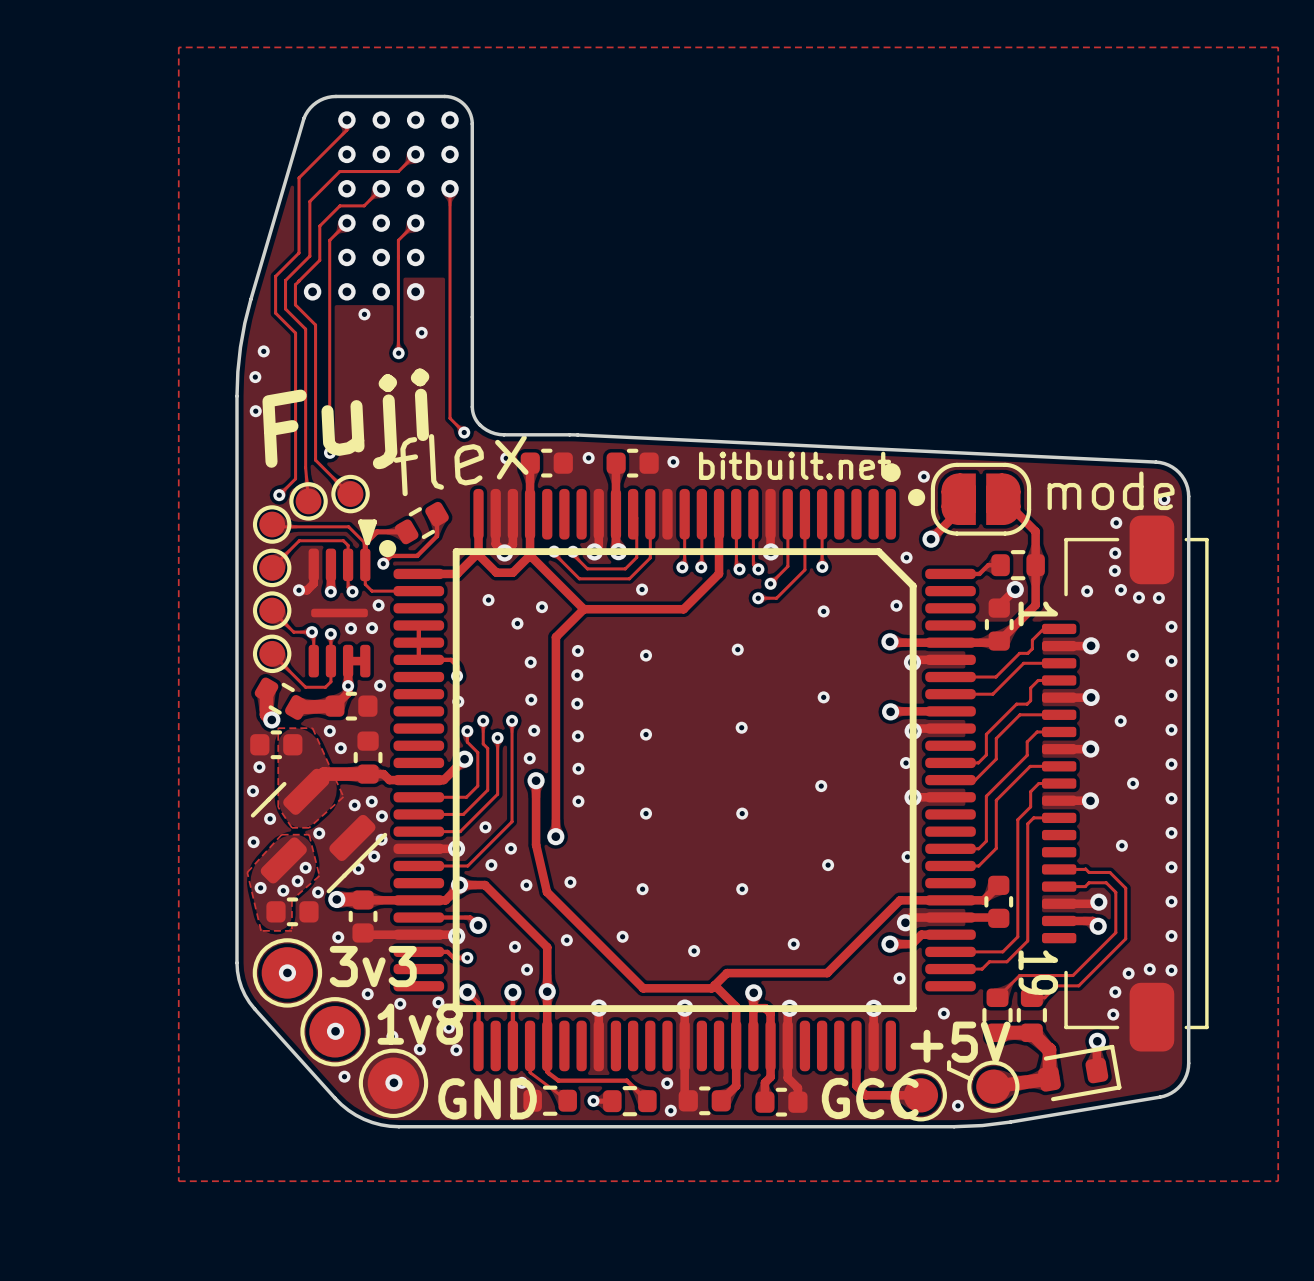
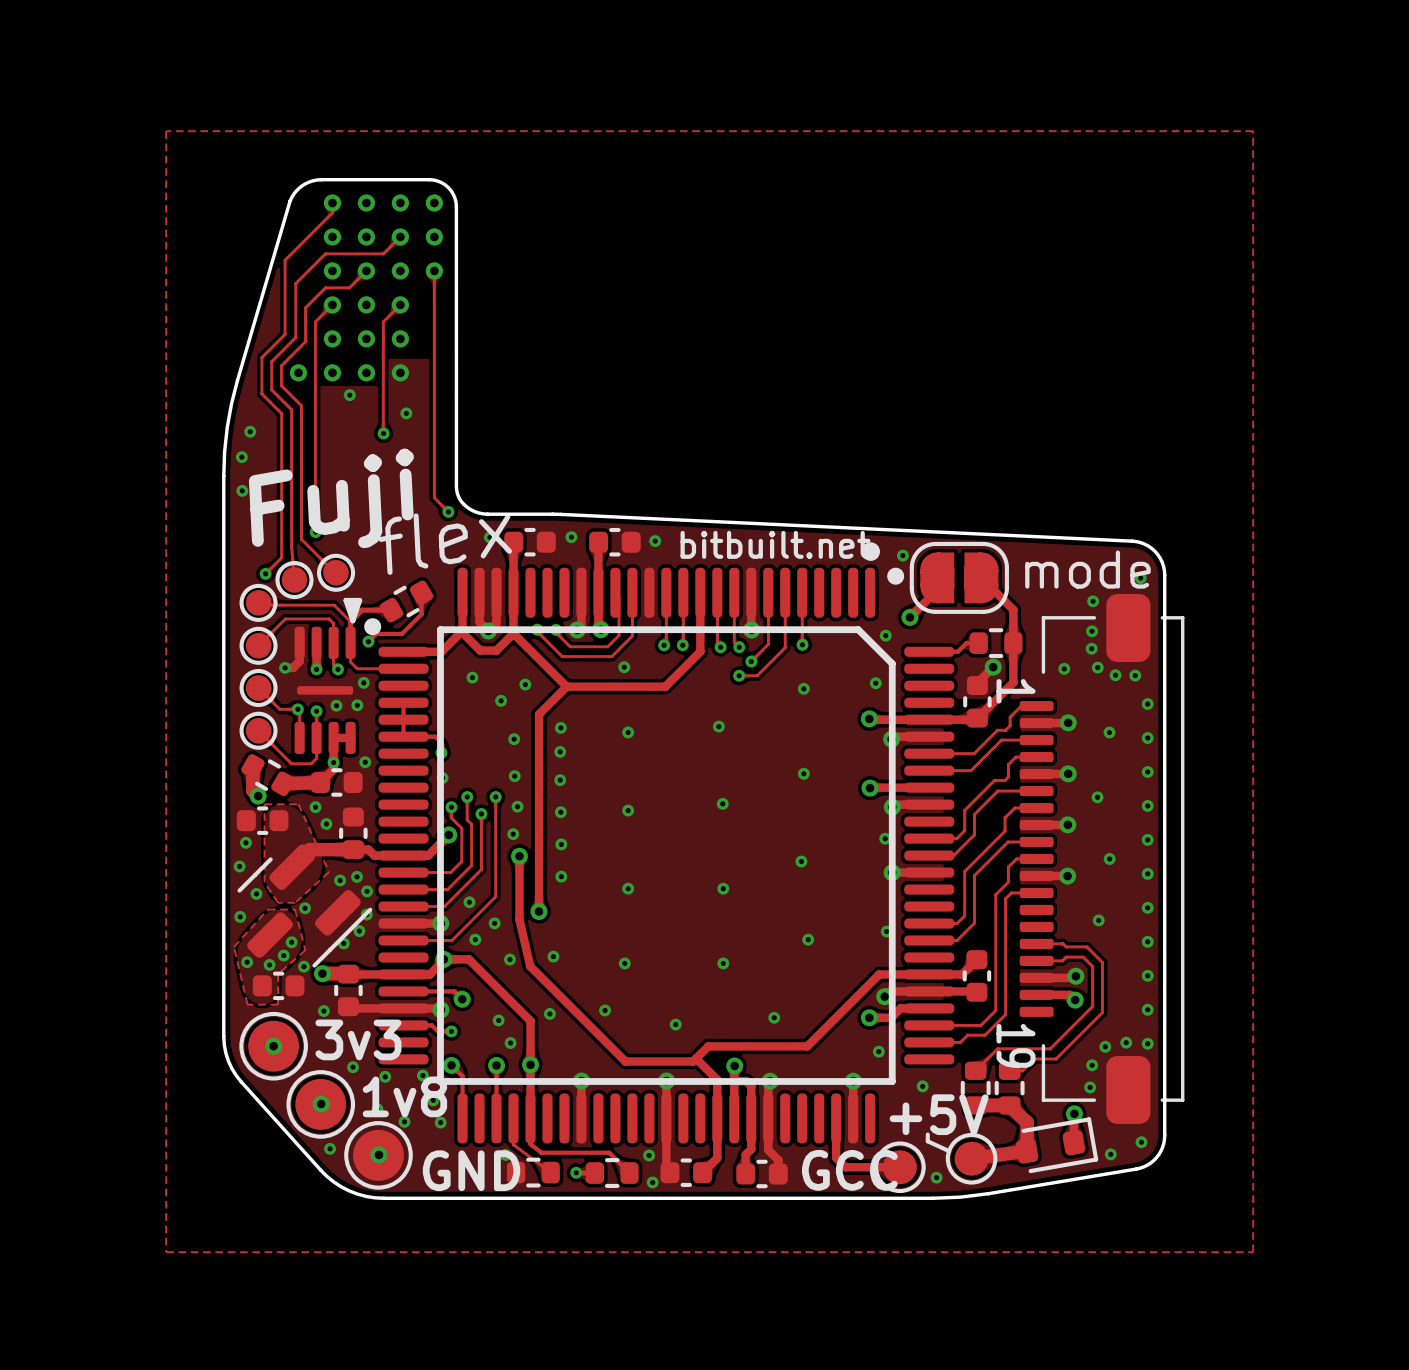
via: none -> (1141, 1142)
via: none -> (1110, 1154)

